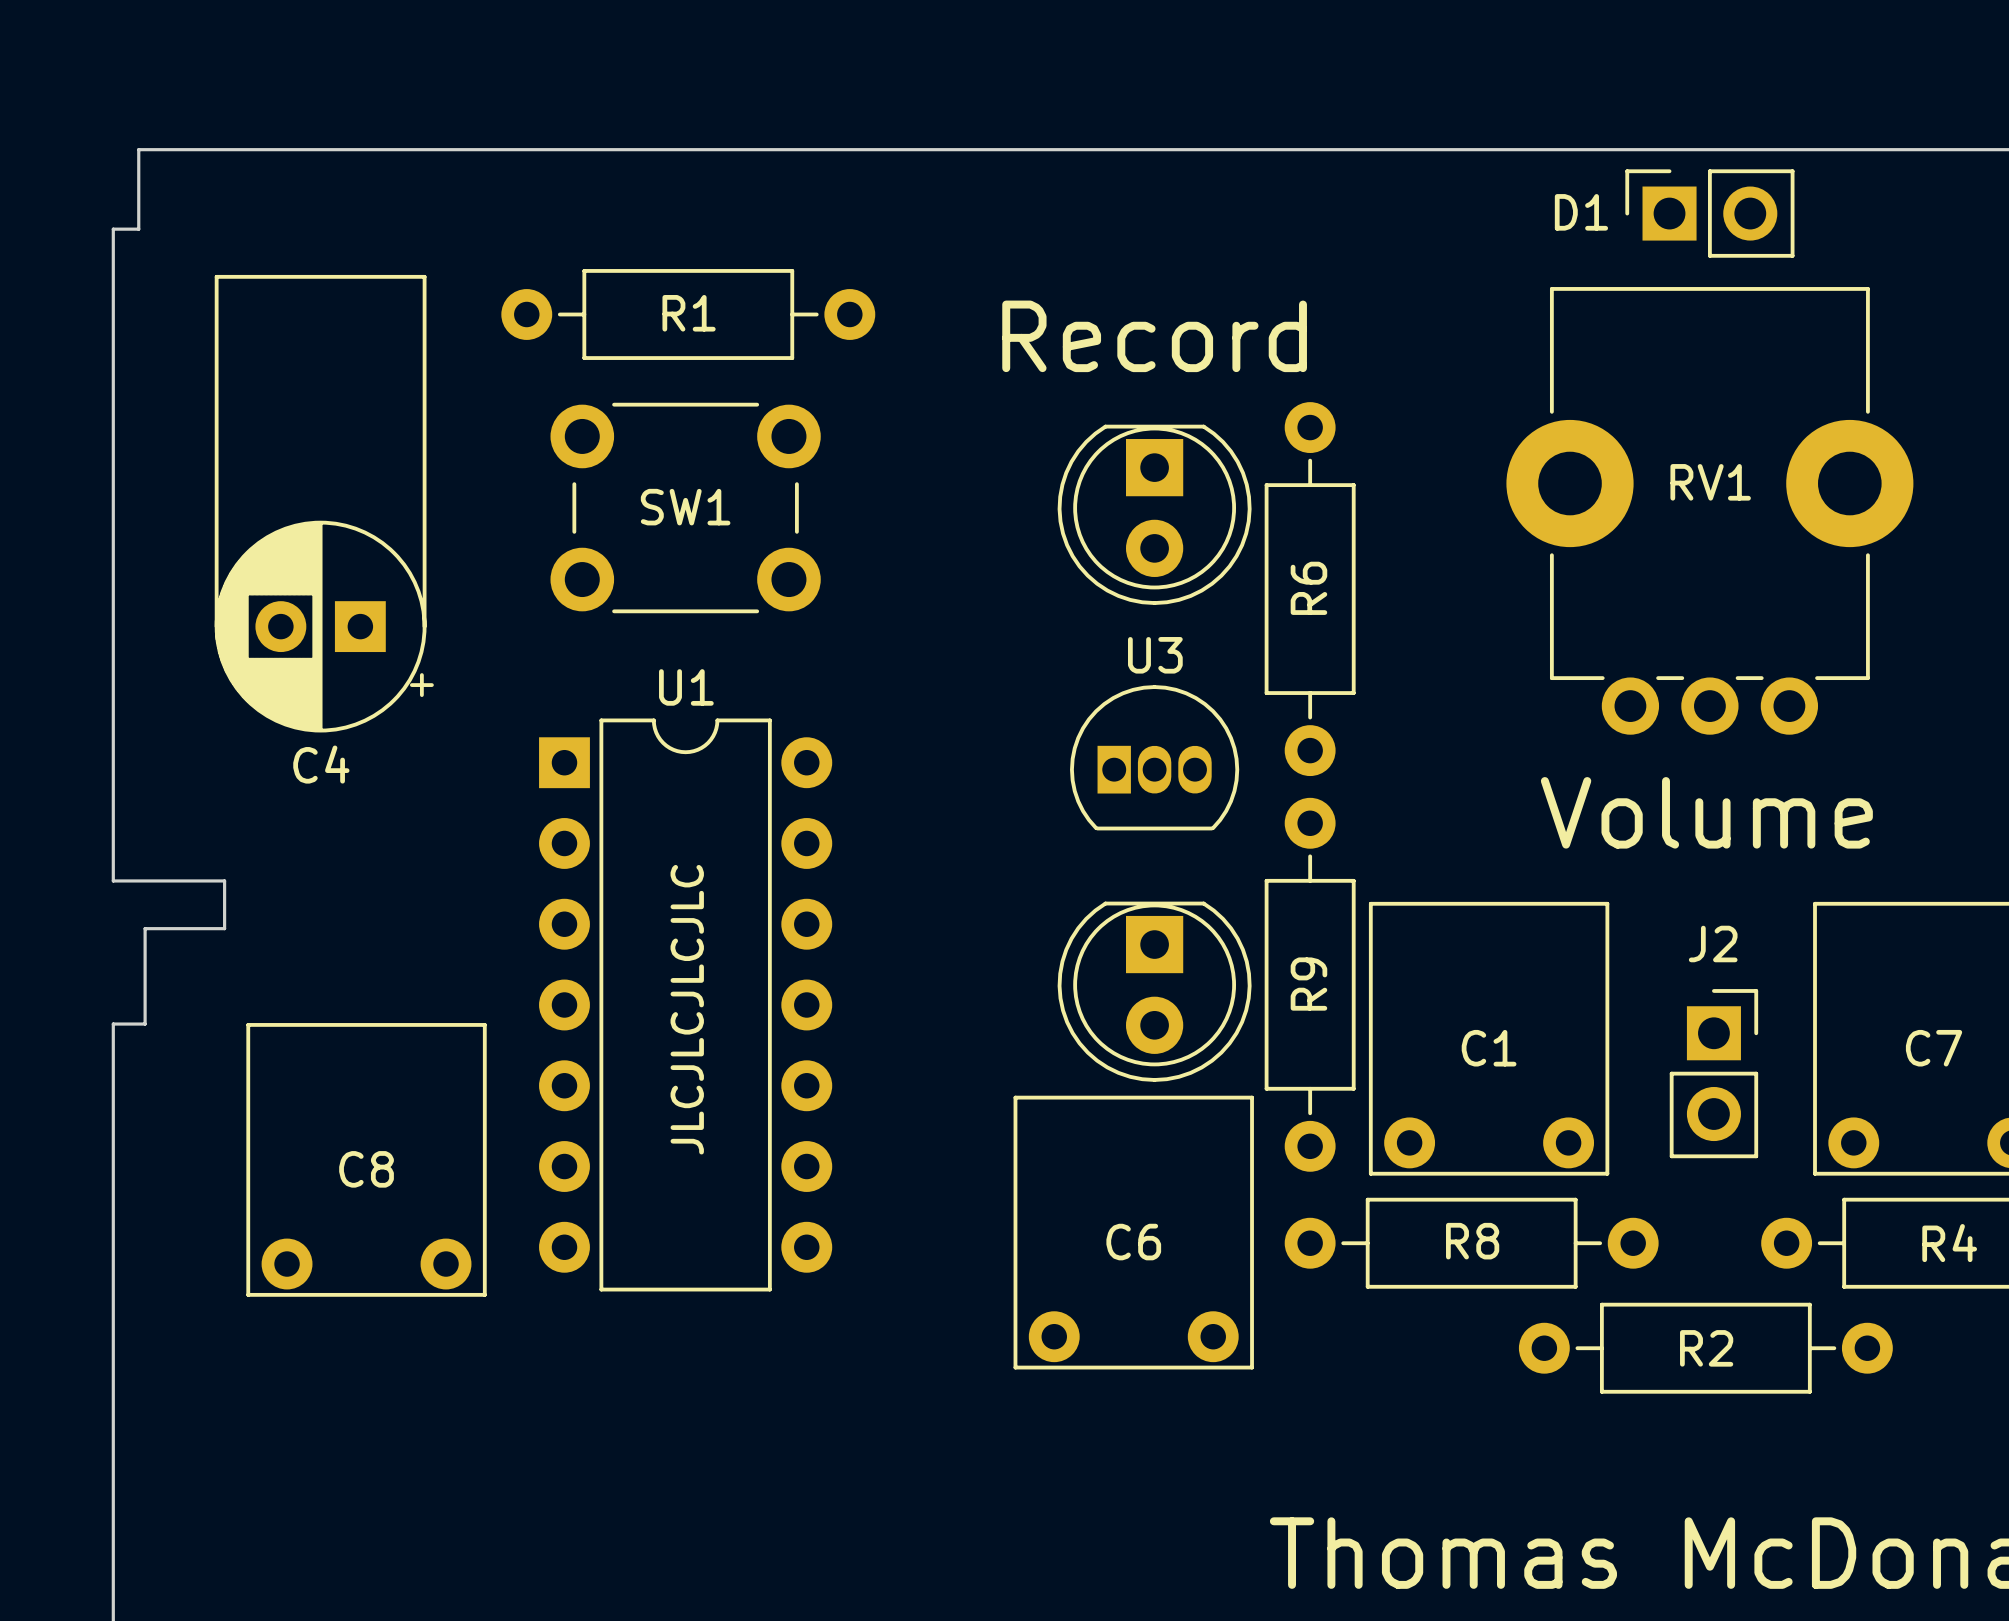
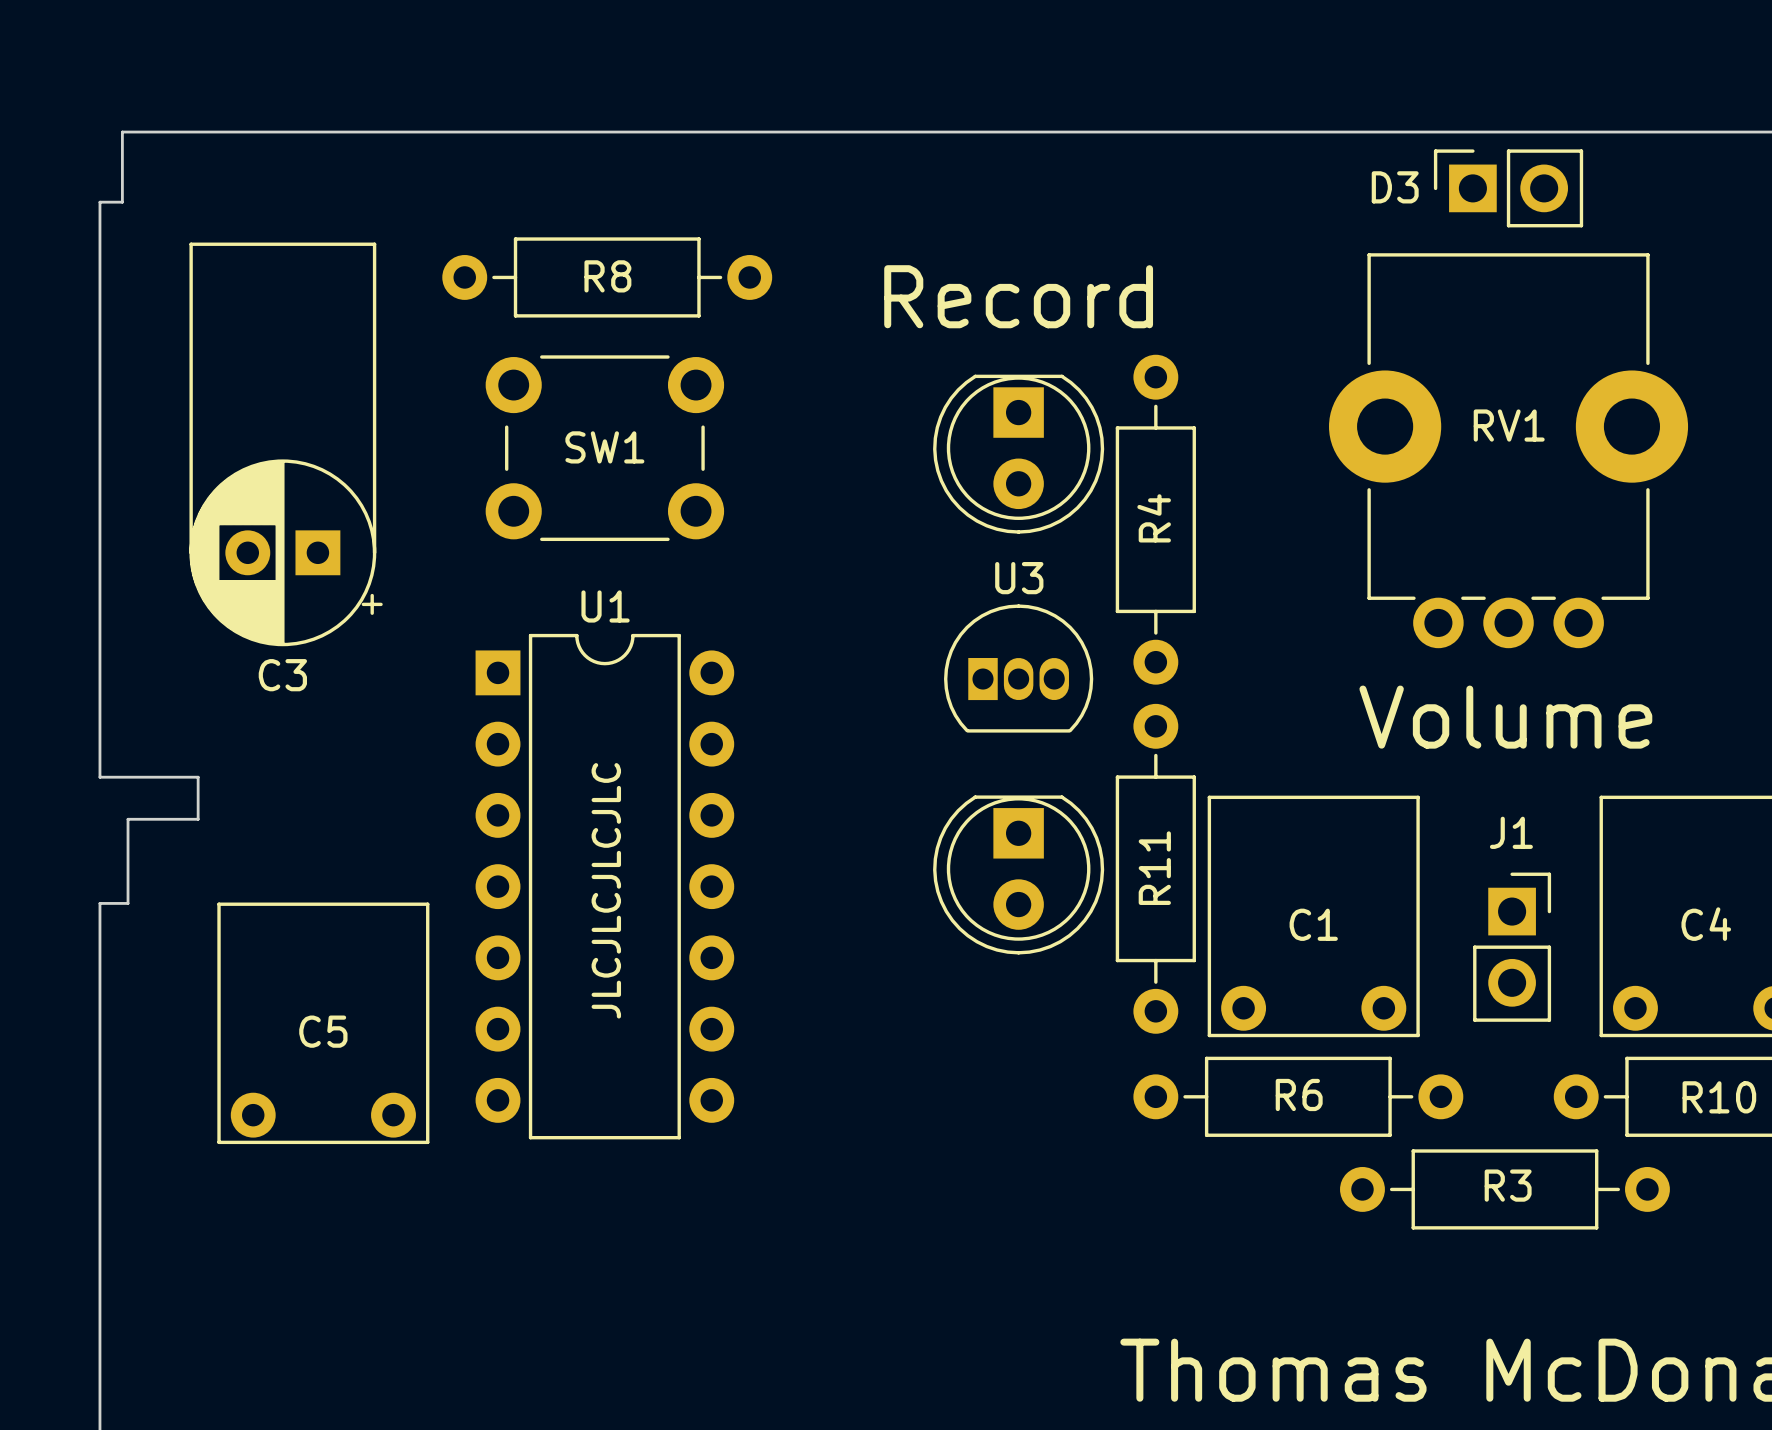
D1 name: D1 (1581, 212) -> D3 (1395, 187)
R1 name: R1 (689, 313) -> R8 (607, 276)
R6 name: R6 (1308, 588) -> R4 (1154, 518)
C4 name: C4 (321, 764) -> C3 (282, 675)
J2 name: J2 (1713, 943) -> J1 (1511, 832)
R9 name: R9 (1308, 984) -> R11 (1154, 868)
C7 name: C7 (1934, 1048) -> C4 (1706, 924)
C8 name: C8 (366, 1169) -> C5 (323, 1031)
C6: (1133, 1232) -> none
R8 name: R8 (1472, 1241) -> R6 (1299, 1094)
R4 name: R4 (1949, 1243) -> R10 (1719, 1097)
R2 name: R2 (1706, 1348) -> R3 (1508, 1185)

